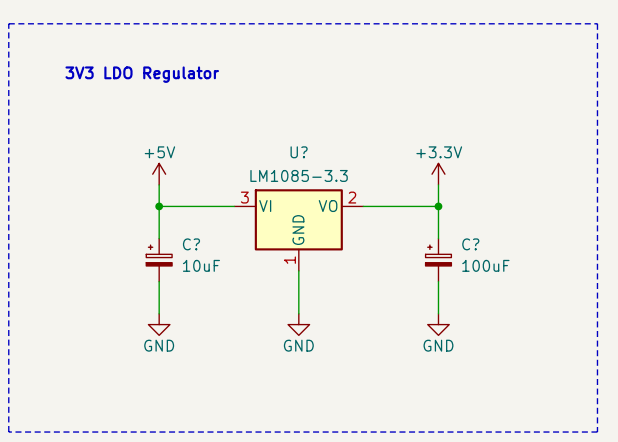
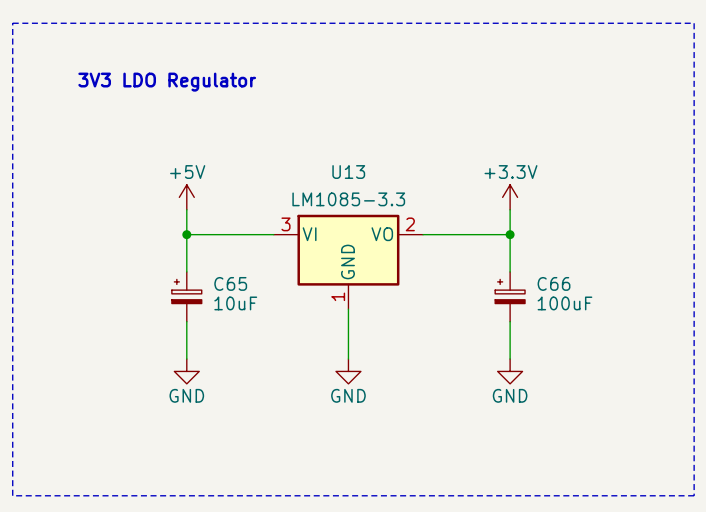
U? name: U? (299, 152) -> U13 (348, 172)
C? name: C? (191, 244) -> C65 (230, 283)
C? name: C? (470, 244) -> C66 (554, 283)

